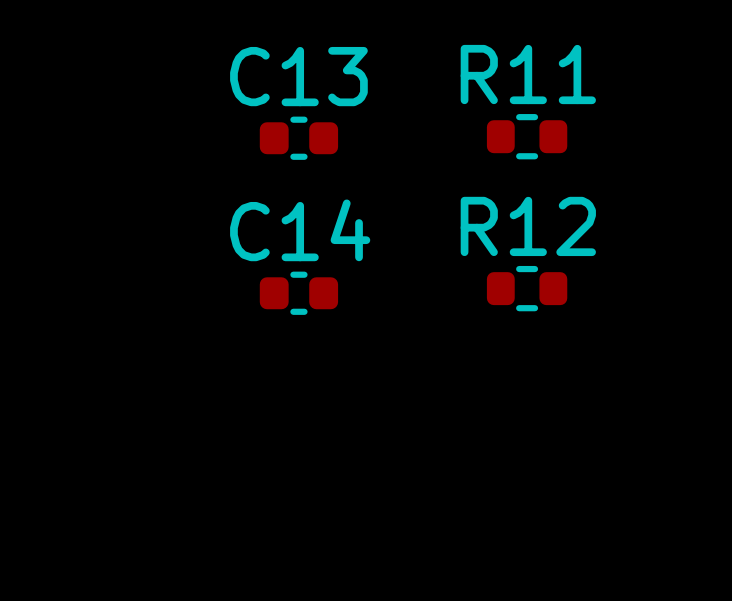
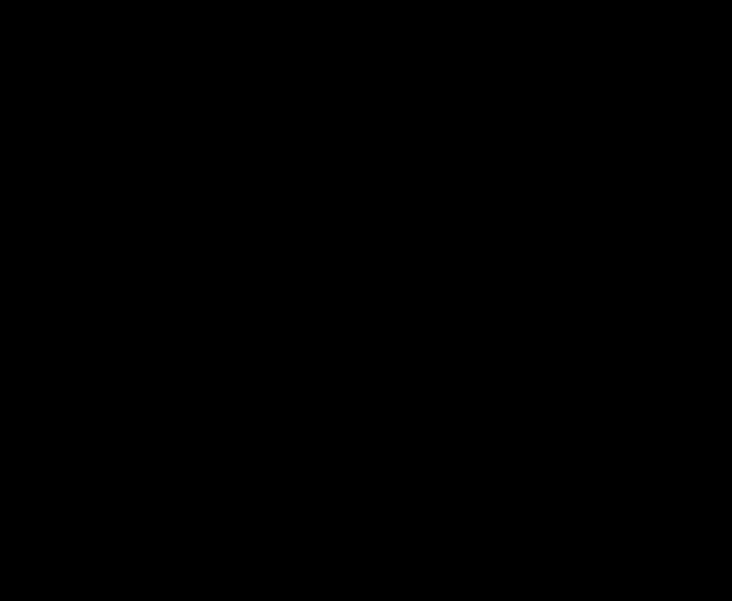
R11: (527, 136) -> none
C13: (298, 138) -> none
R12: (527, 288) -> none
C14: (298, 293) -> none

